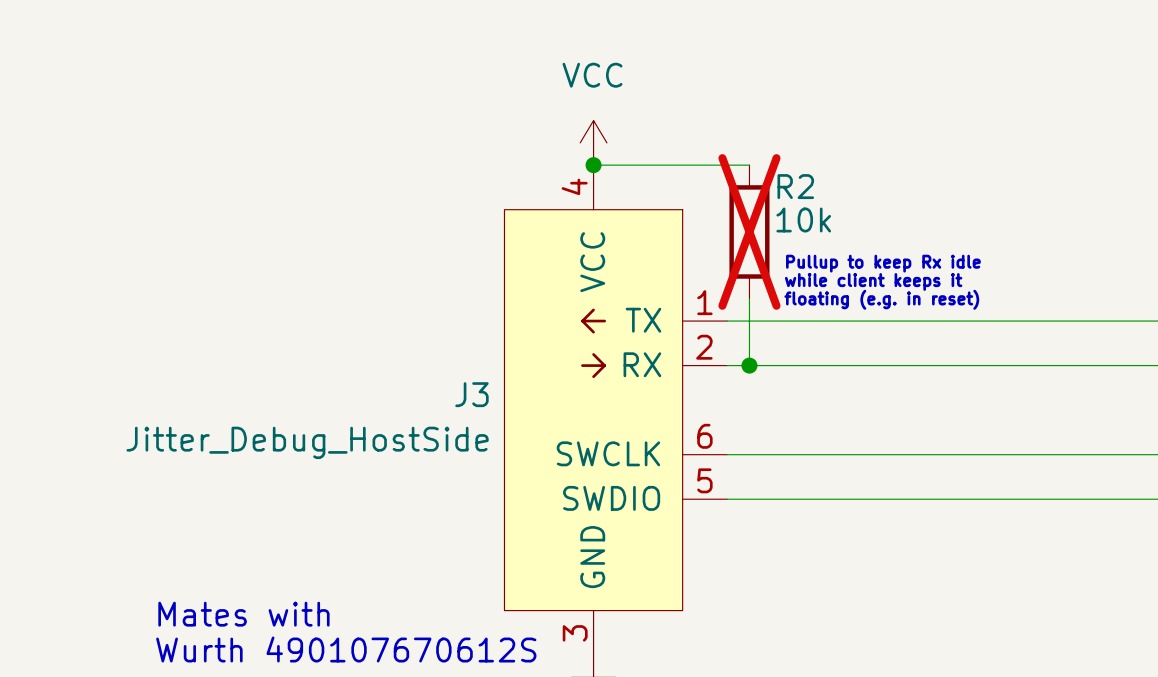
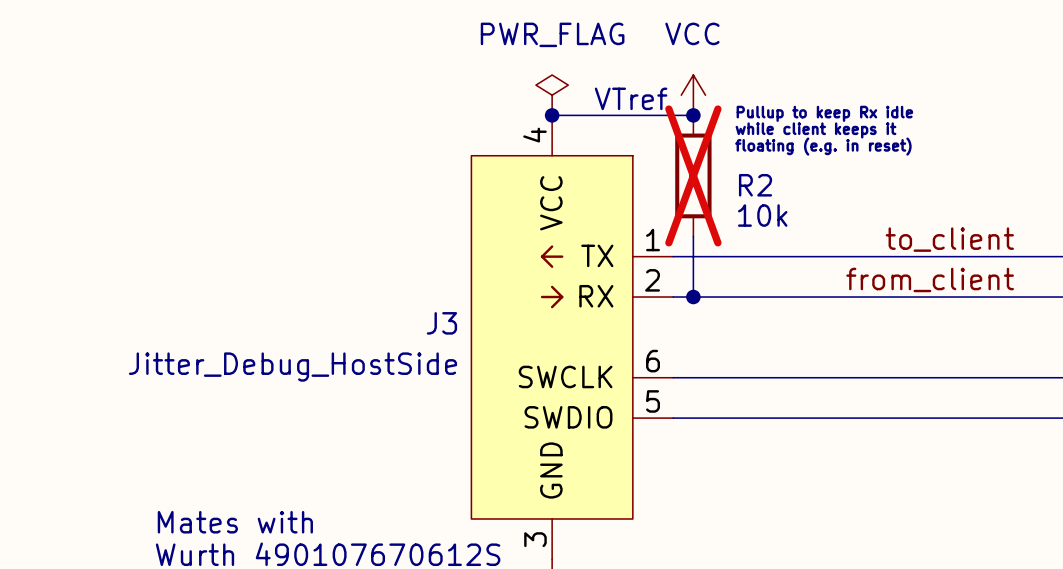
power symbol: VCC (593, 142) -> PWR_FLAG (552, 95)
power symbol: none -> VCC (693, 95)
text: none -> VTref (631, 98)
junction: none -> (693, 115)
R2 name position: R2 (795, 186) -> R2 (755, 185)
R2 value position: 10k (803, 219) -> 10k (762, 215)
text position: Pullup to keep Rx idle (883, 263) -> Pullup to keep Rx idle (824, 113)
text position: while client keeps it (873, 281) -> while client keeps it (816, 130)
text position: floating (e.g. in reset) (881, 299) -> floating (e.g. in reset) (823, 146)
label: none -> to_client (949, 239)
label: none -> from_client (930, 279)

